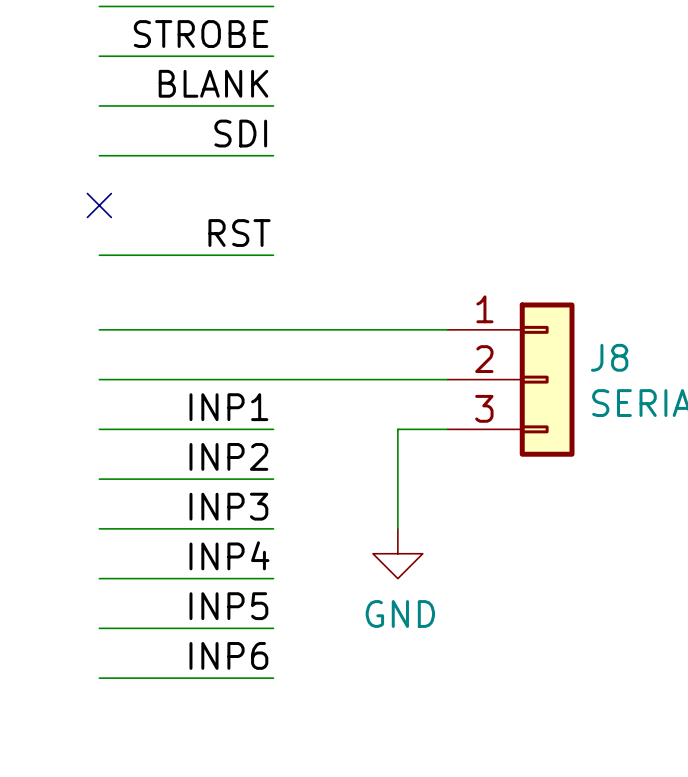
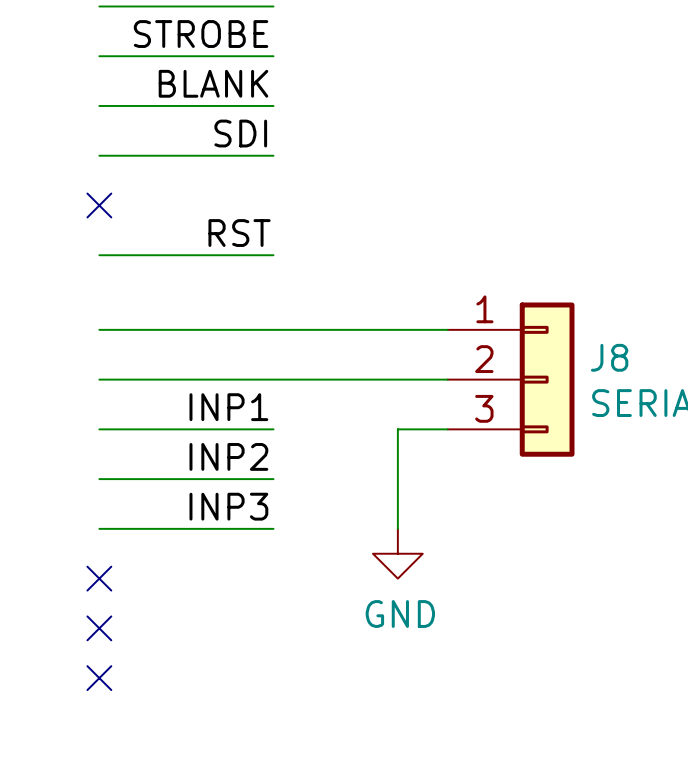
label: INP4 (229, 555) -> none
wire: (99, 578) (273, 578) -> none
no-connect mark: none -> (99, 578)
label: INP5 (228, 606) -> none
wire: (99, 628) (273, 628) -> none
no-connect mark: none -> (99, 628)
label: INP6 (228, 655) -> none
wire: (99, 678) (273, 678) -> none
no-connect mark: none -> (99, 678)

